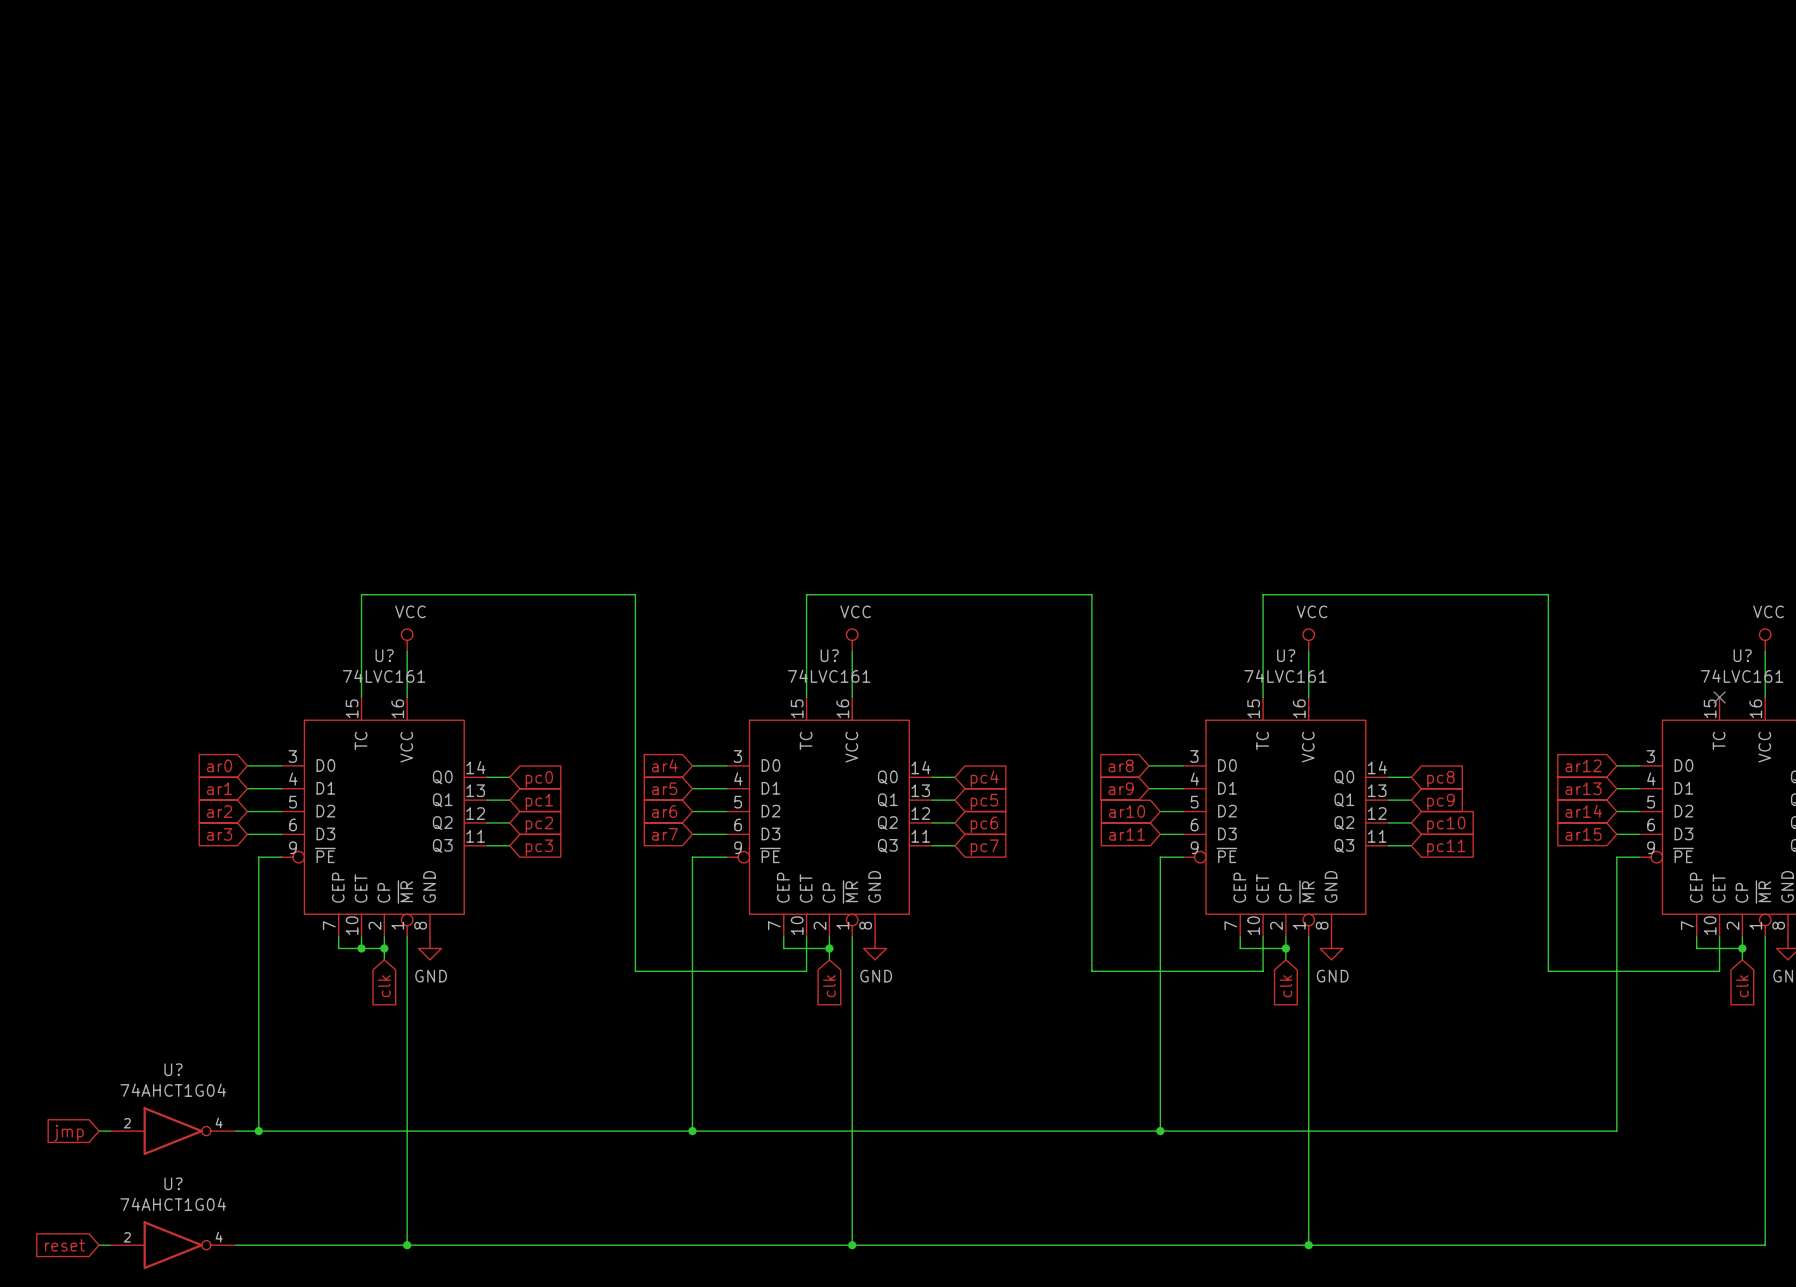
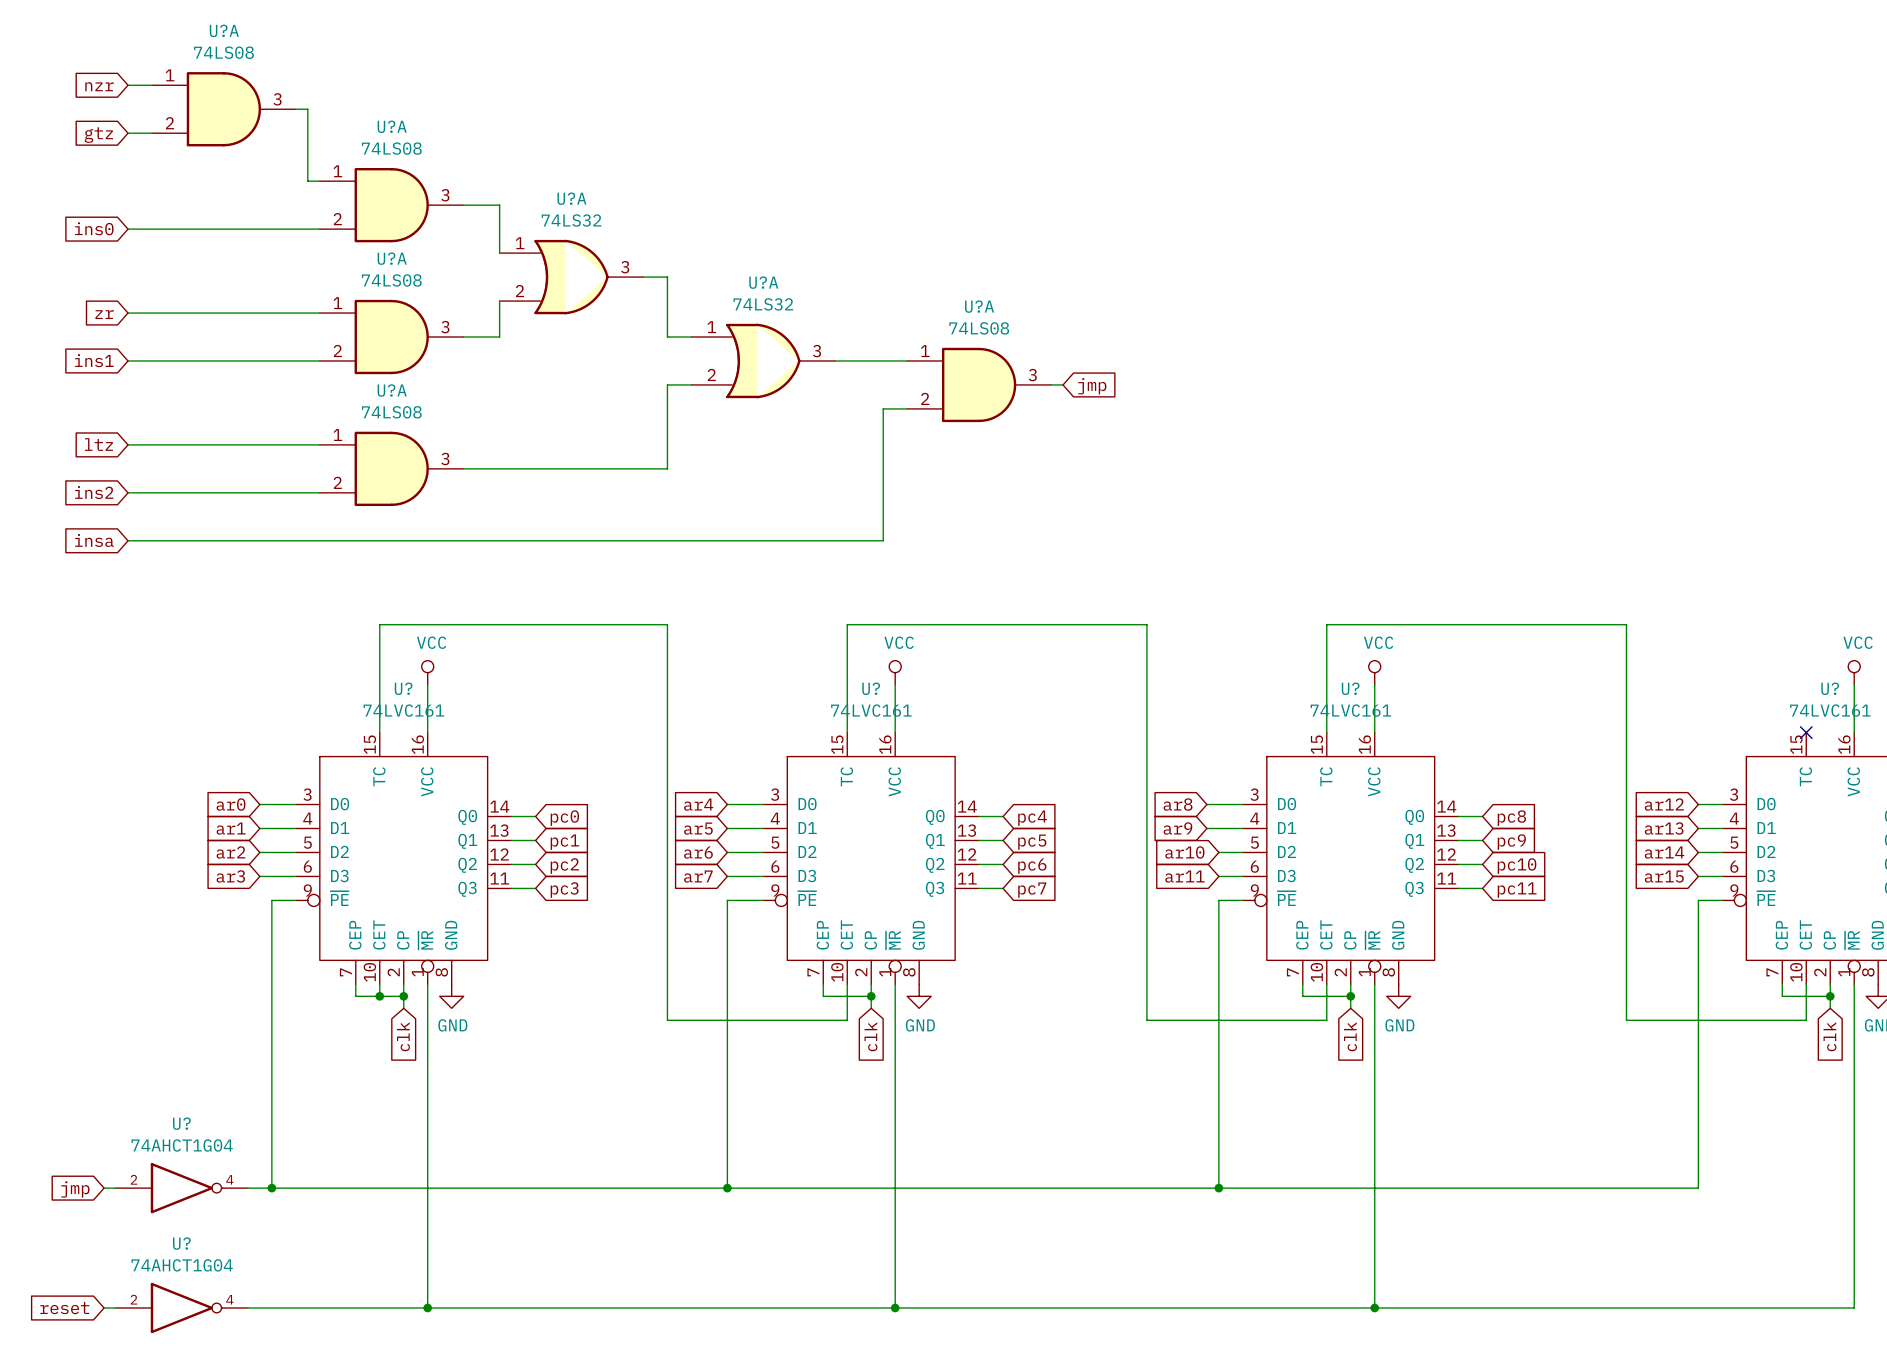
wire: none -> (128, 85) (151, 85)
global label: none -> nzr (99, 86)
U?A: none -> 74LS08 (223, 109)
wire: none -> (295, 109) (307, 109) (307, 181) (319, 181)
wire: none -> (128, 133) (151, 133)
global label: none -> gtz (98, 135)
U?A: none -> 74LS08 (391, 205)
wire: none -> (463, 205) (499, 205) (499, 253)
global label: none -> ins0 (94, 228)
wire: none -> (128, 229) (319, 229)
U?A: none -> 74LS32 (571, 277)
wire: none -> (643, 277) (667, 277) (667, 337) (691, 337)
wire: none -> (499, 301) (499, 337) (463, 337)
wire: none -> (128, 313) (319, 313)
global label: none -> zr (104, 314)
U?A: none -> 74LS08 (391, 337)
global label: none -> ins1 (94, 360)
wire: none -> (128, 360) (319, 360)
U?A: none -> 74LS32 (763, 360)
wire: none -> (835, 360) (907, 360)
wire: none -> (691, 384) (667, 384) (667, 468) (463, 468)
U?A: none -> 74LS08 (979, 384)
wire: none -> (1051, 384) (1063, 384)
global label: none -> jmp (1092, 386)
wire: none -> (907, 408) (883, 408) (883, 540) (128, 540)
global label: none -> ltz (99, 444)
wire: none -> (128, 444) (319, 444)
U?A: none -> 74LS08 (391, 468)
global label: none -> ins2 (94, 492)
wire: none -> (128, 492) (319, 492)
global label: none -> insa (94, 540)

